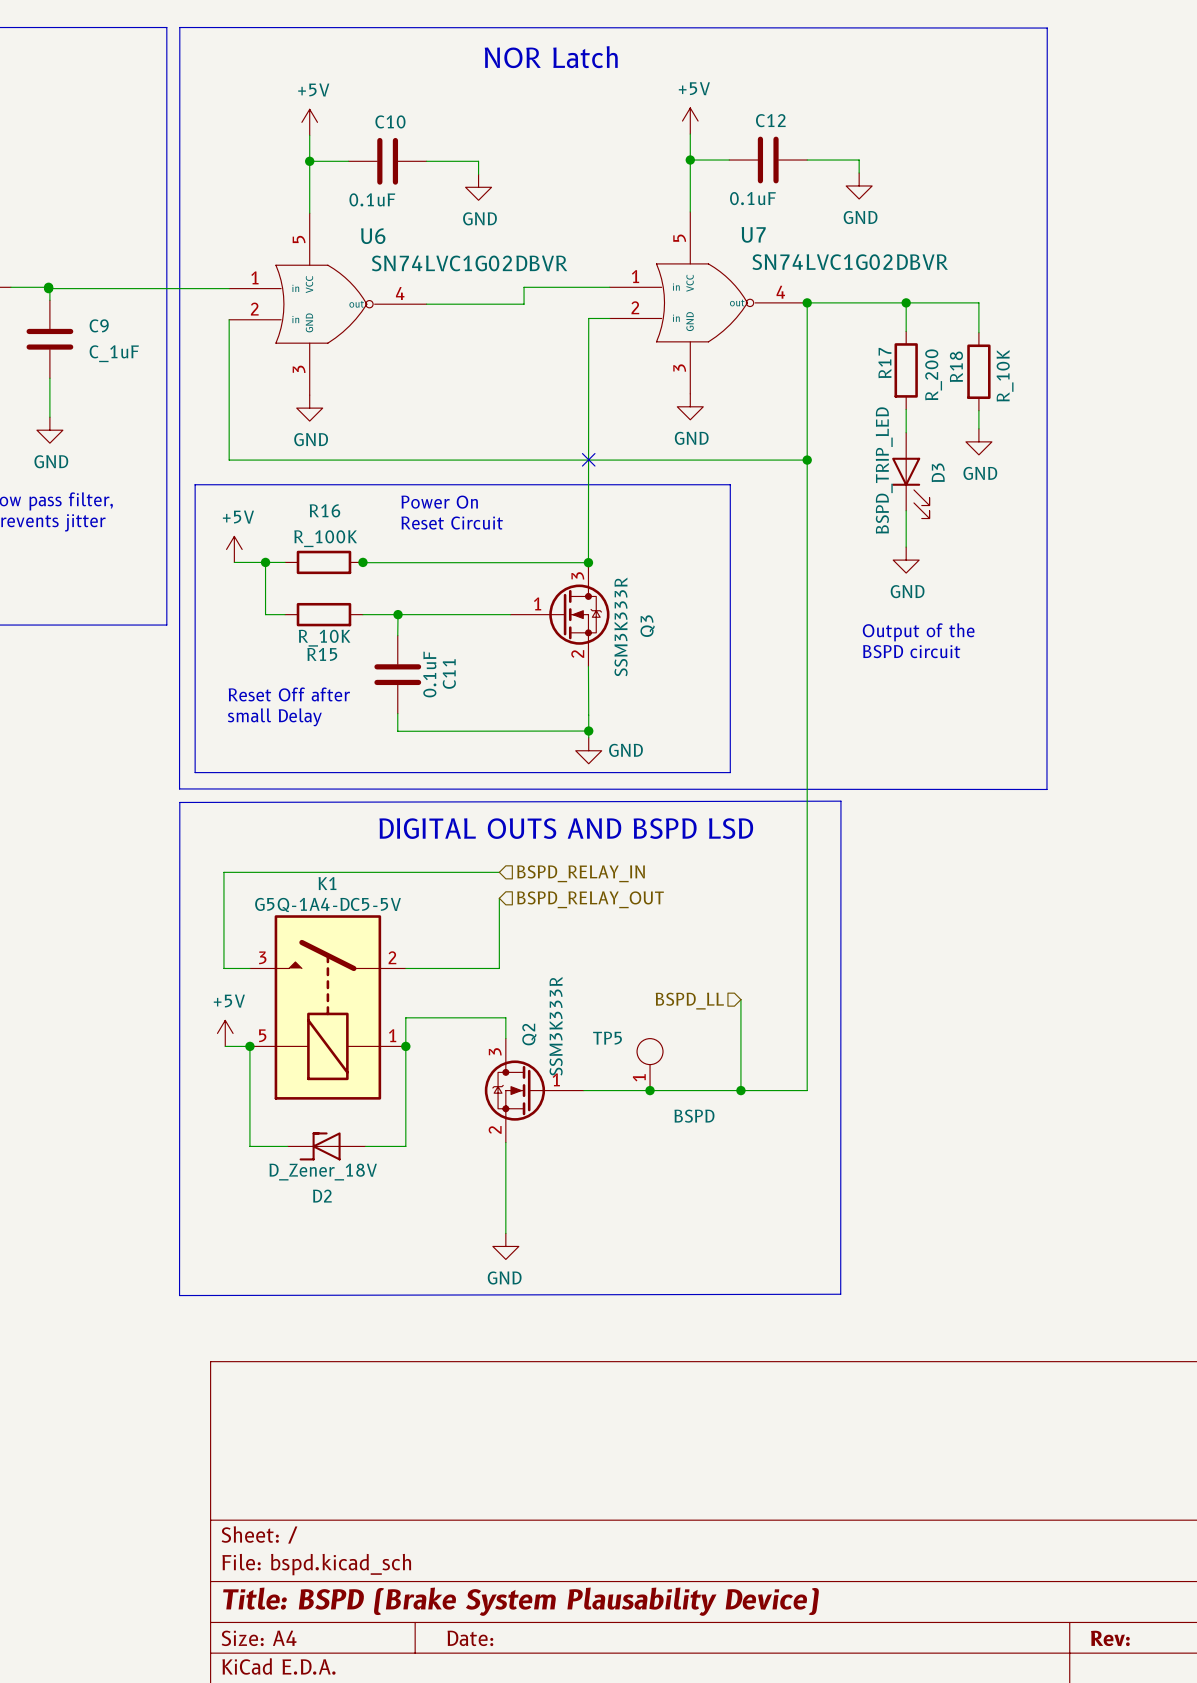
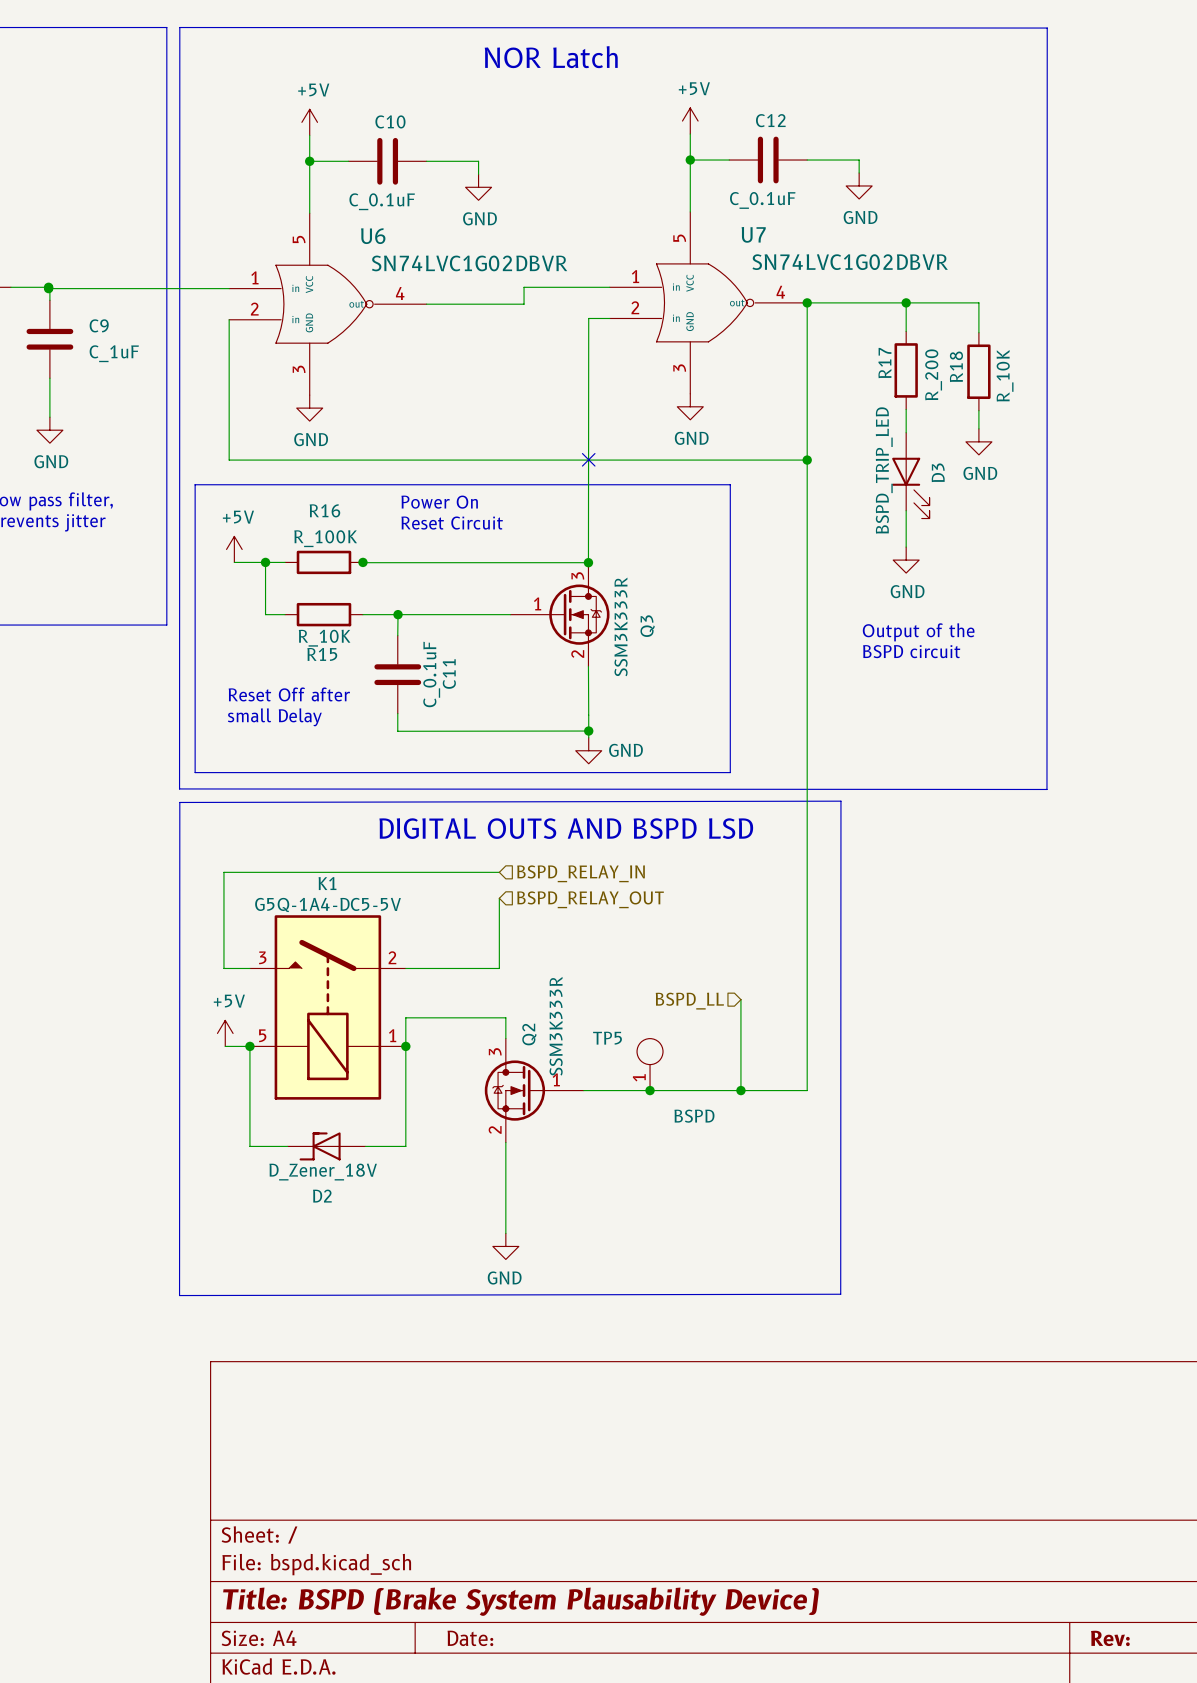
C12 value: 0.1uF (752, 198) -> C_0.1uF (762, 200)
C10 value: 0.1uF (372, 199) -> C_0.1uF (382, 201)
C11 value: 0.1uF (429, 674) -> C_0.1uF (431, 674)

